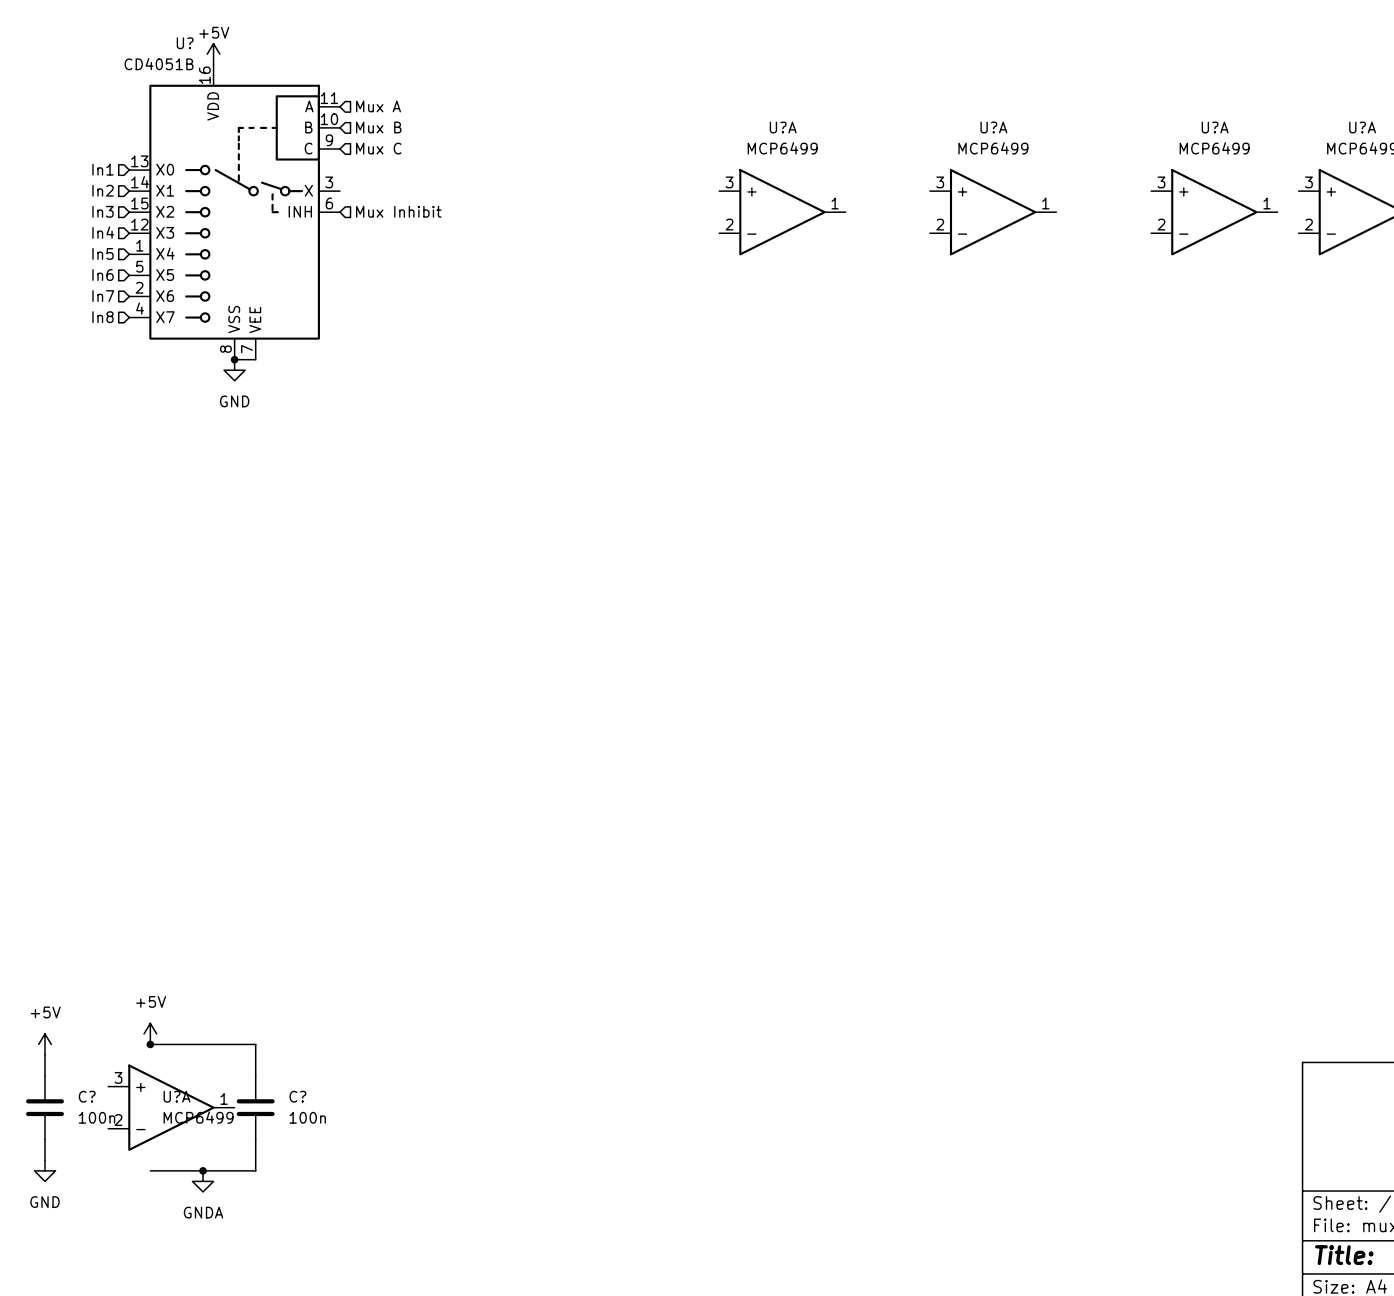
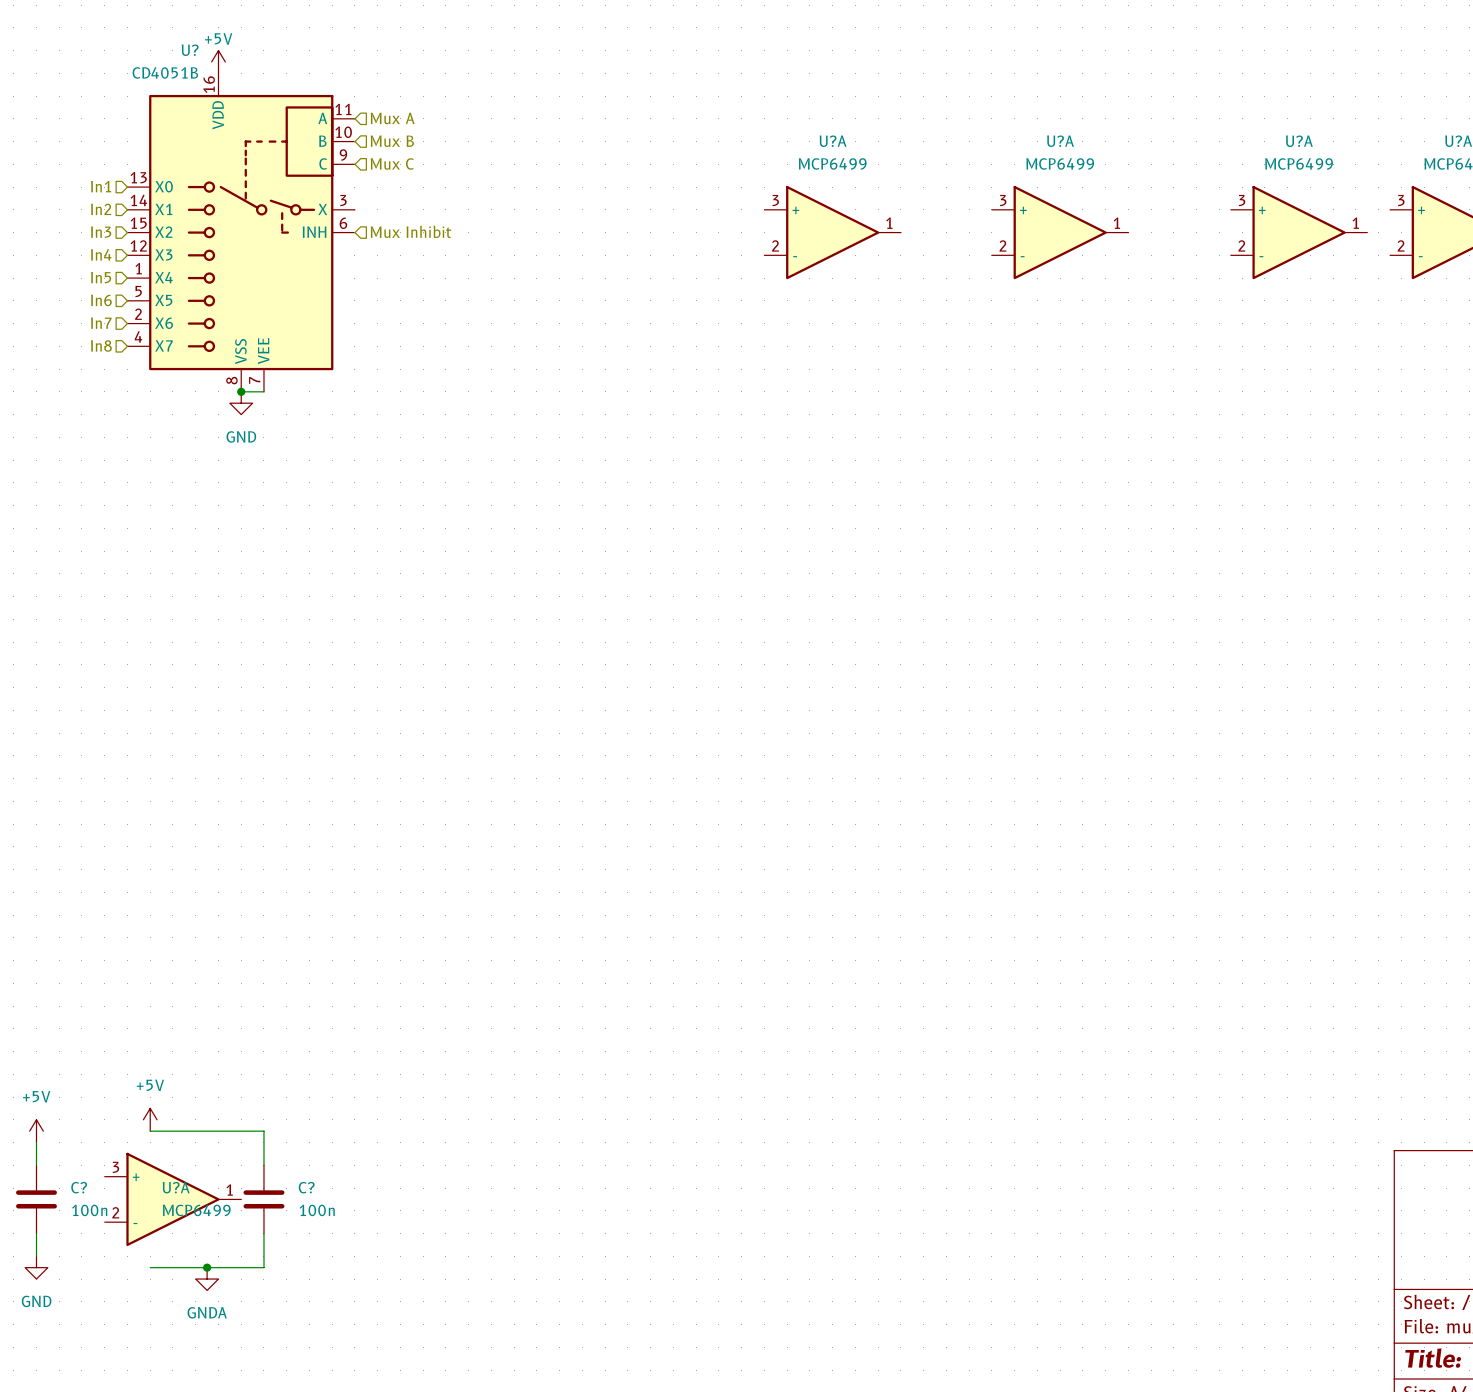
junction: (150, 1044) -> none

